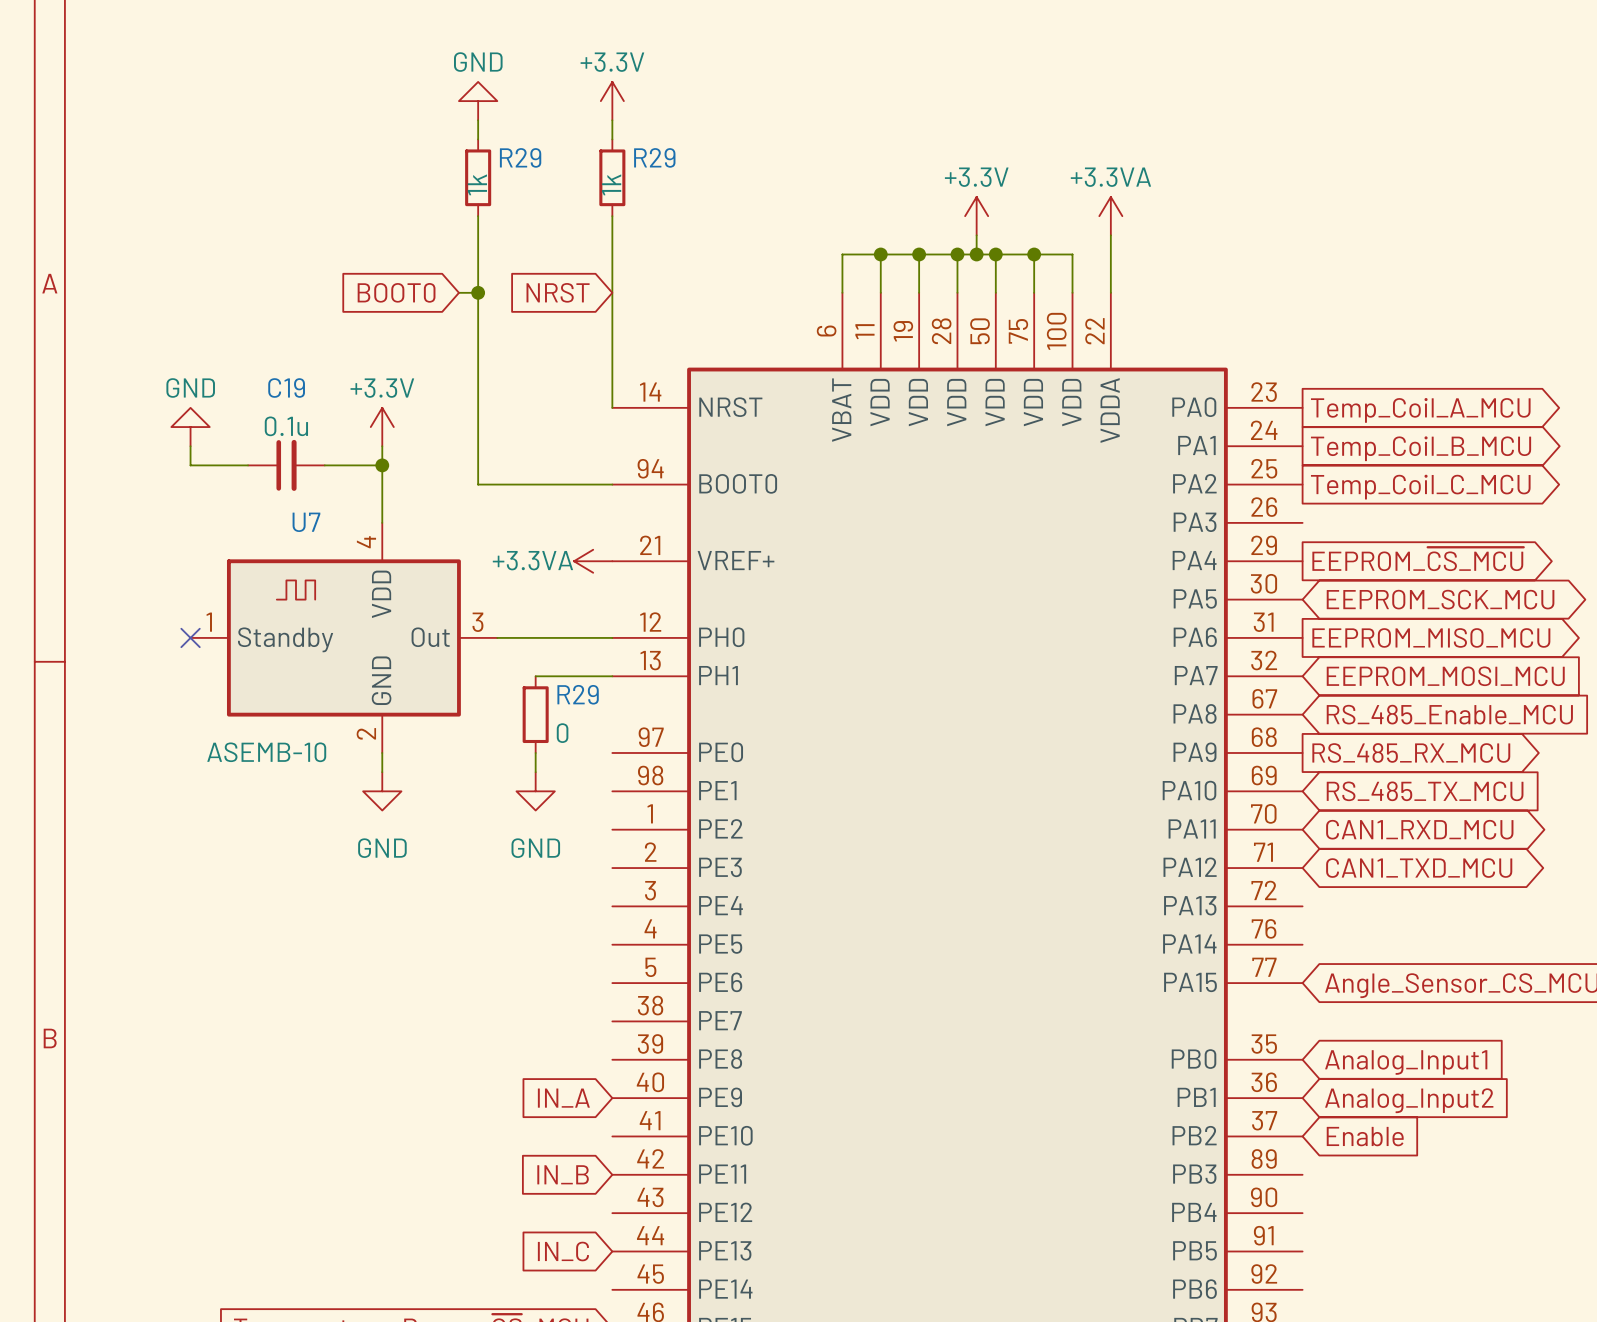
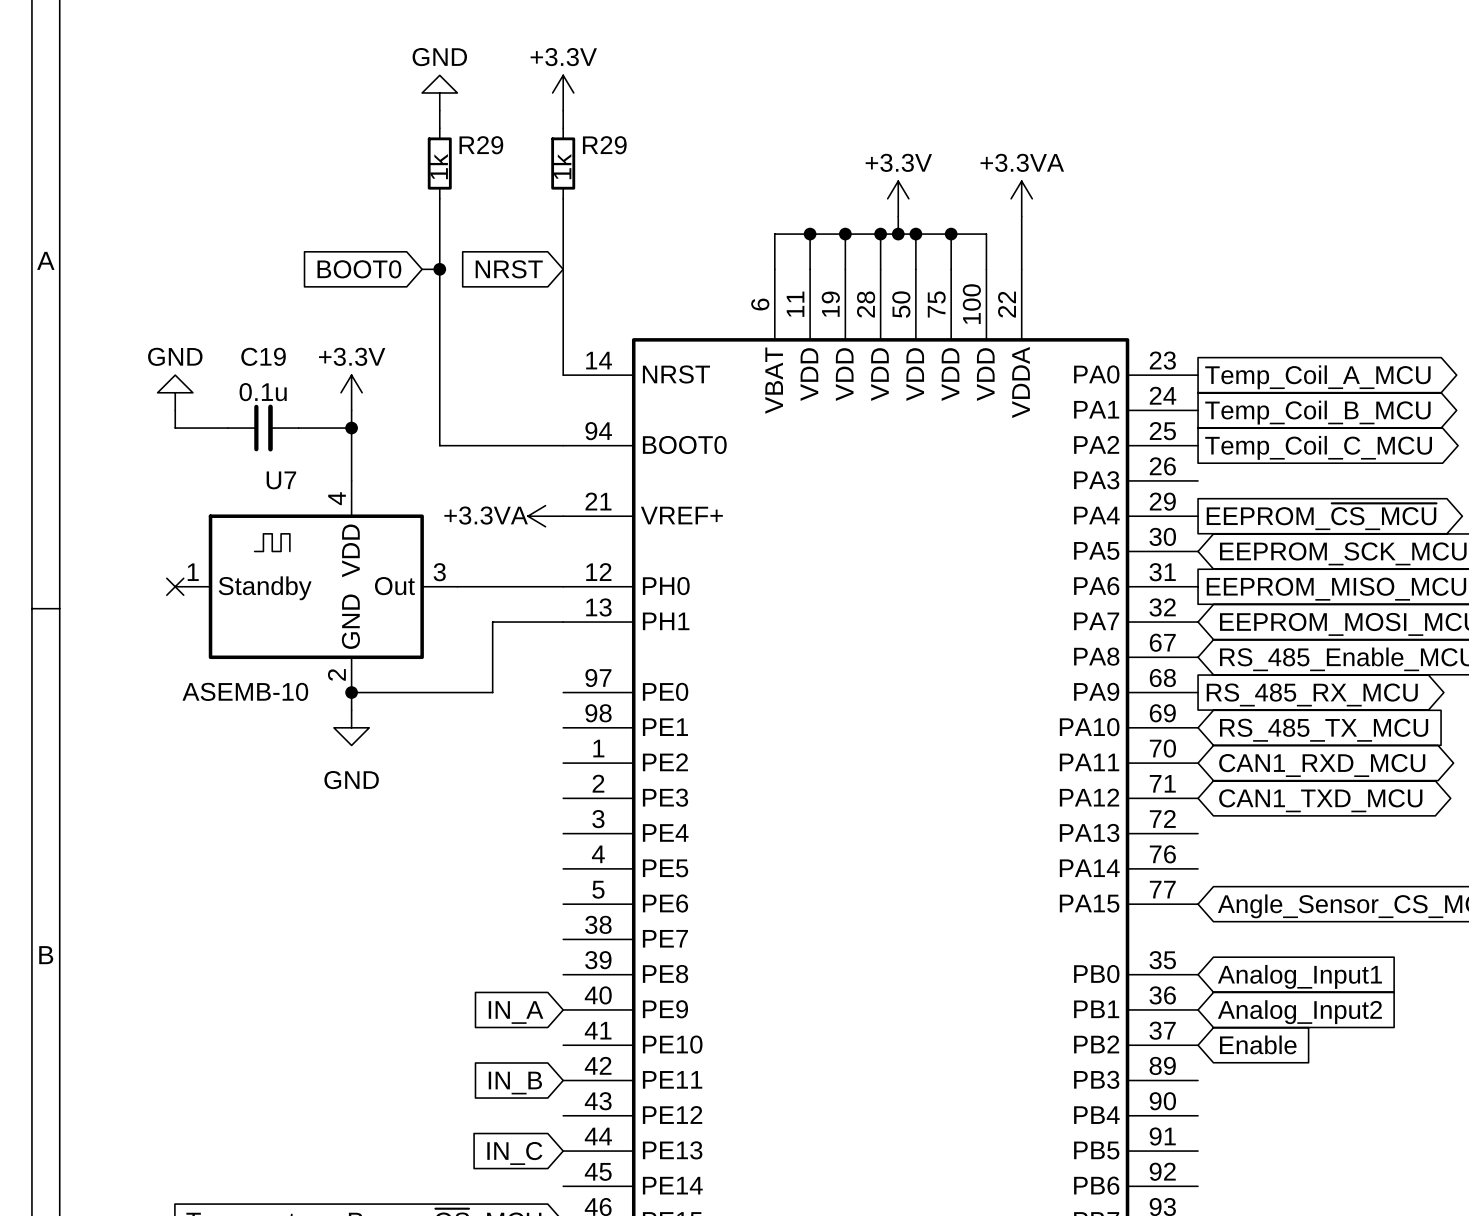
wire: none -> (492, 622) (492, 692) (351, 692)
R29: 0 (535, 714) -> none
junction: none -> (351, 692)
wire: (535, 752) (535, 772) -> none
power symbol: GND (535, 791) -> none

